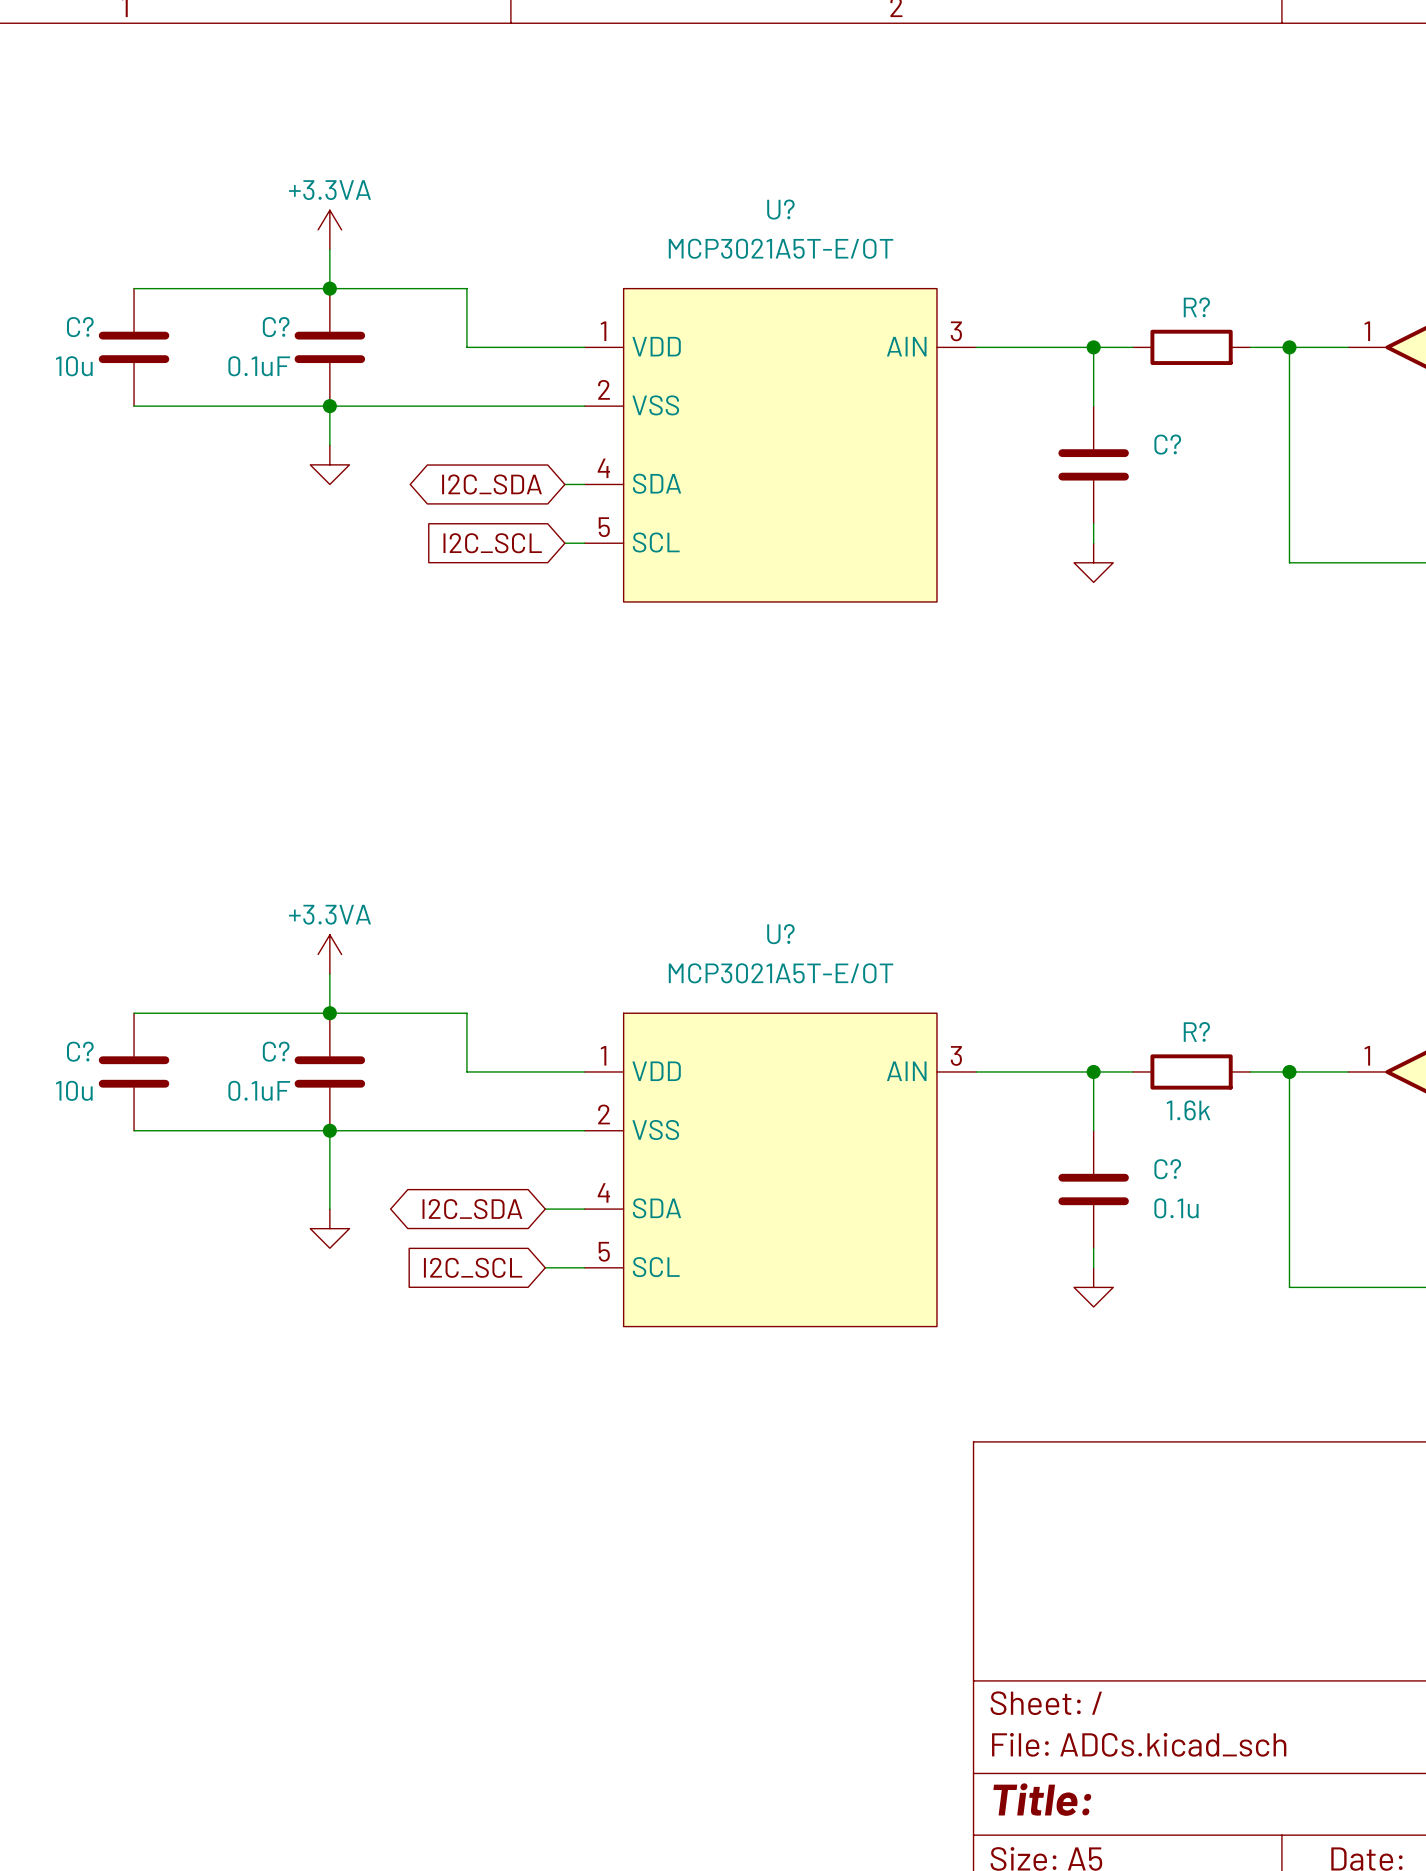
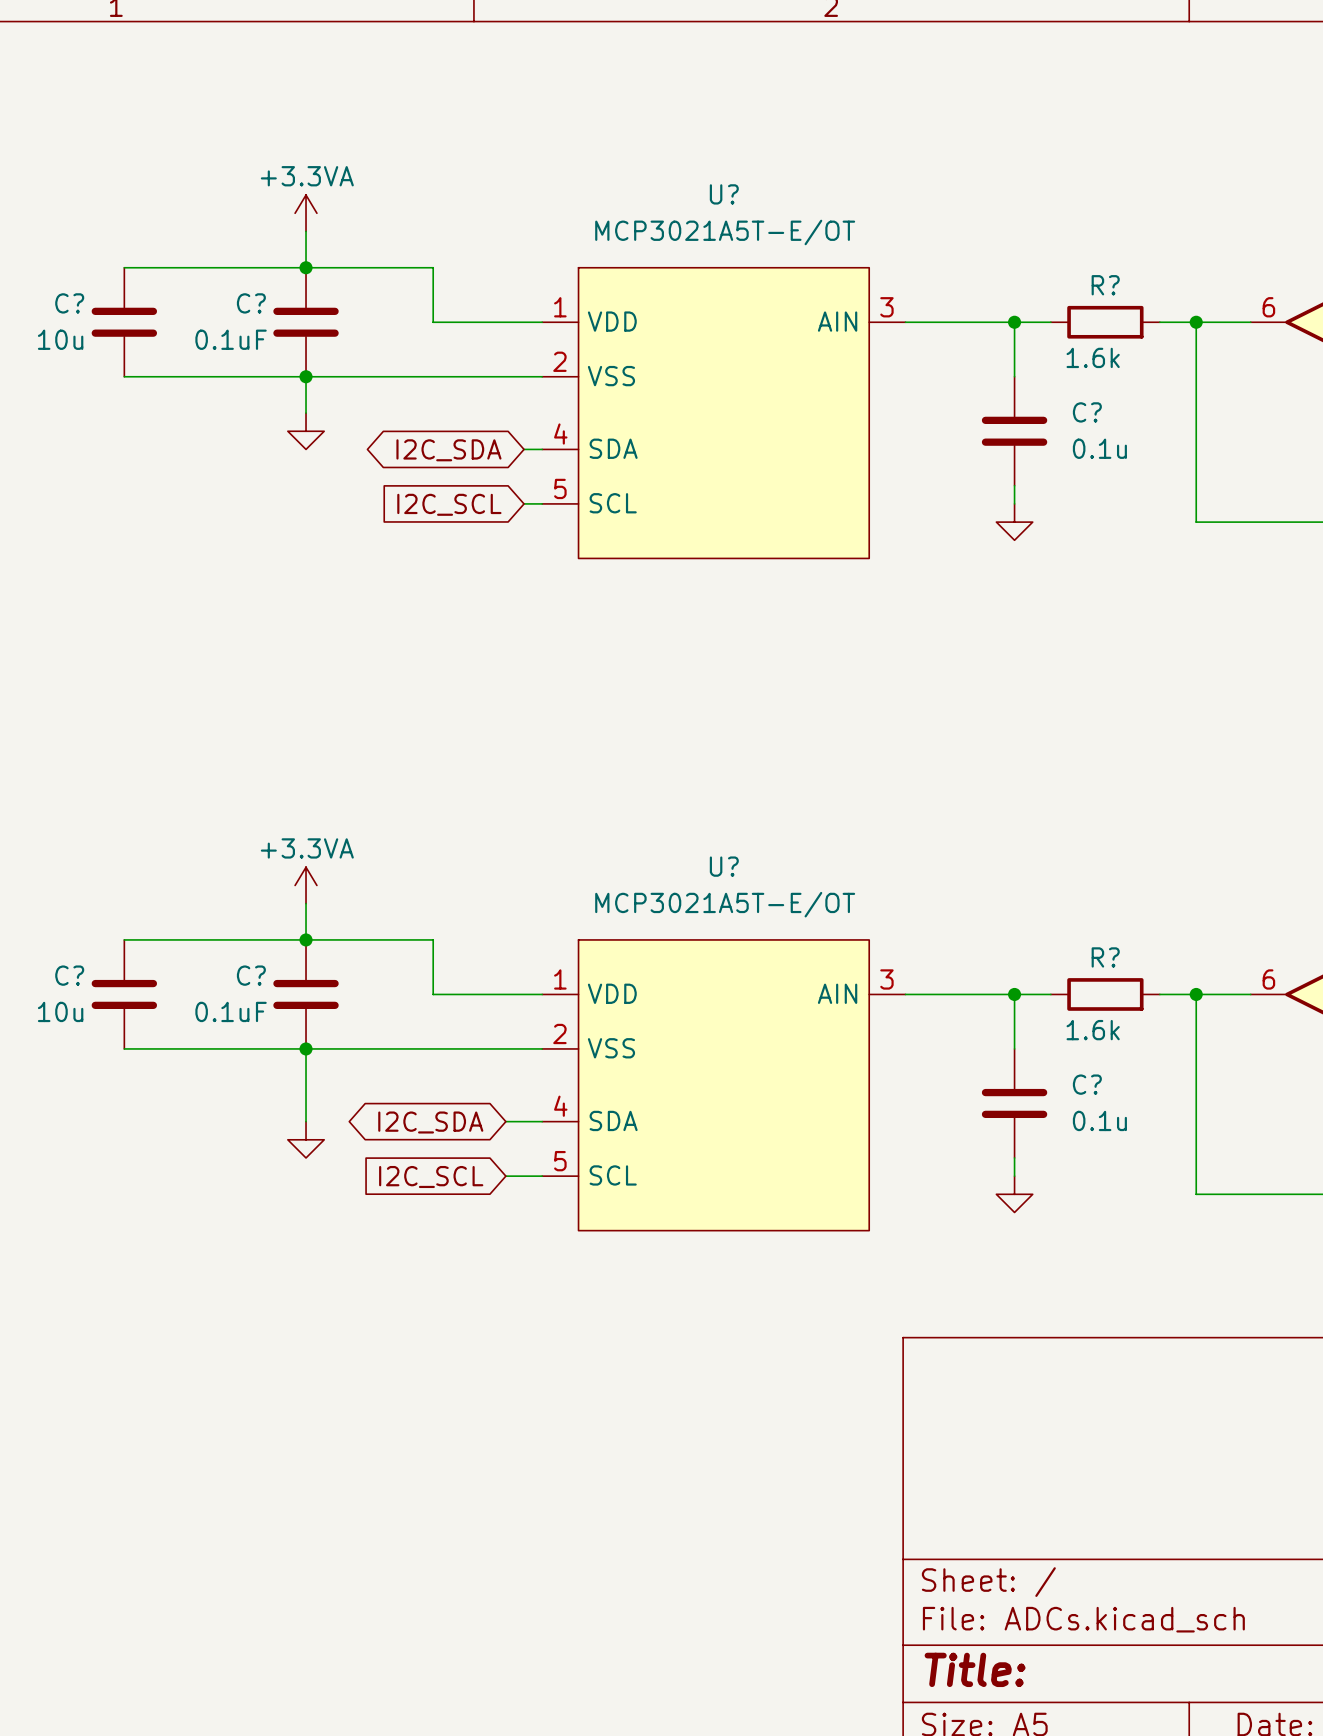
part pin number: 1 (1367, 331) -> 6 (1268, 307)
R? value: none -> 1.6k (1093, 357)
C? value: none -> 0.1u (1099, 448)
part pin number: 1 (1367, 1055) -> 6 (1268, 979)

